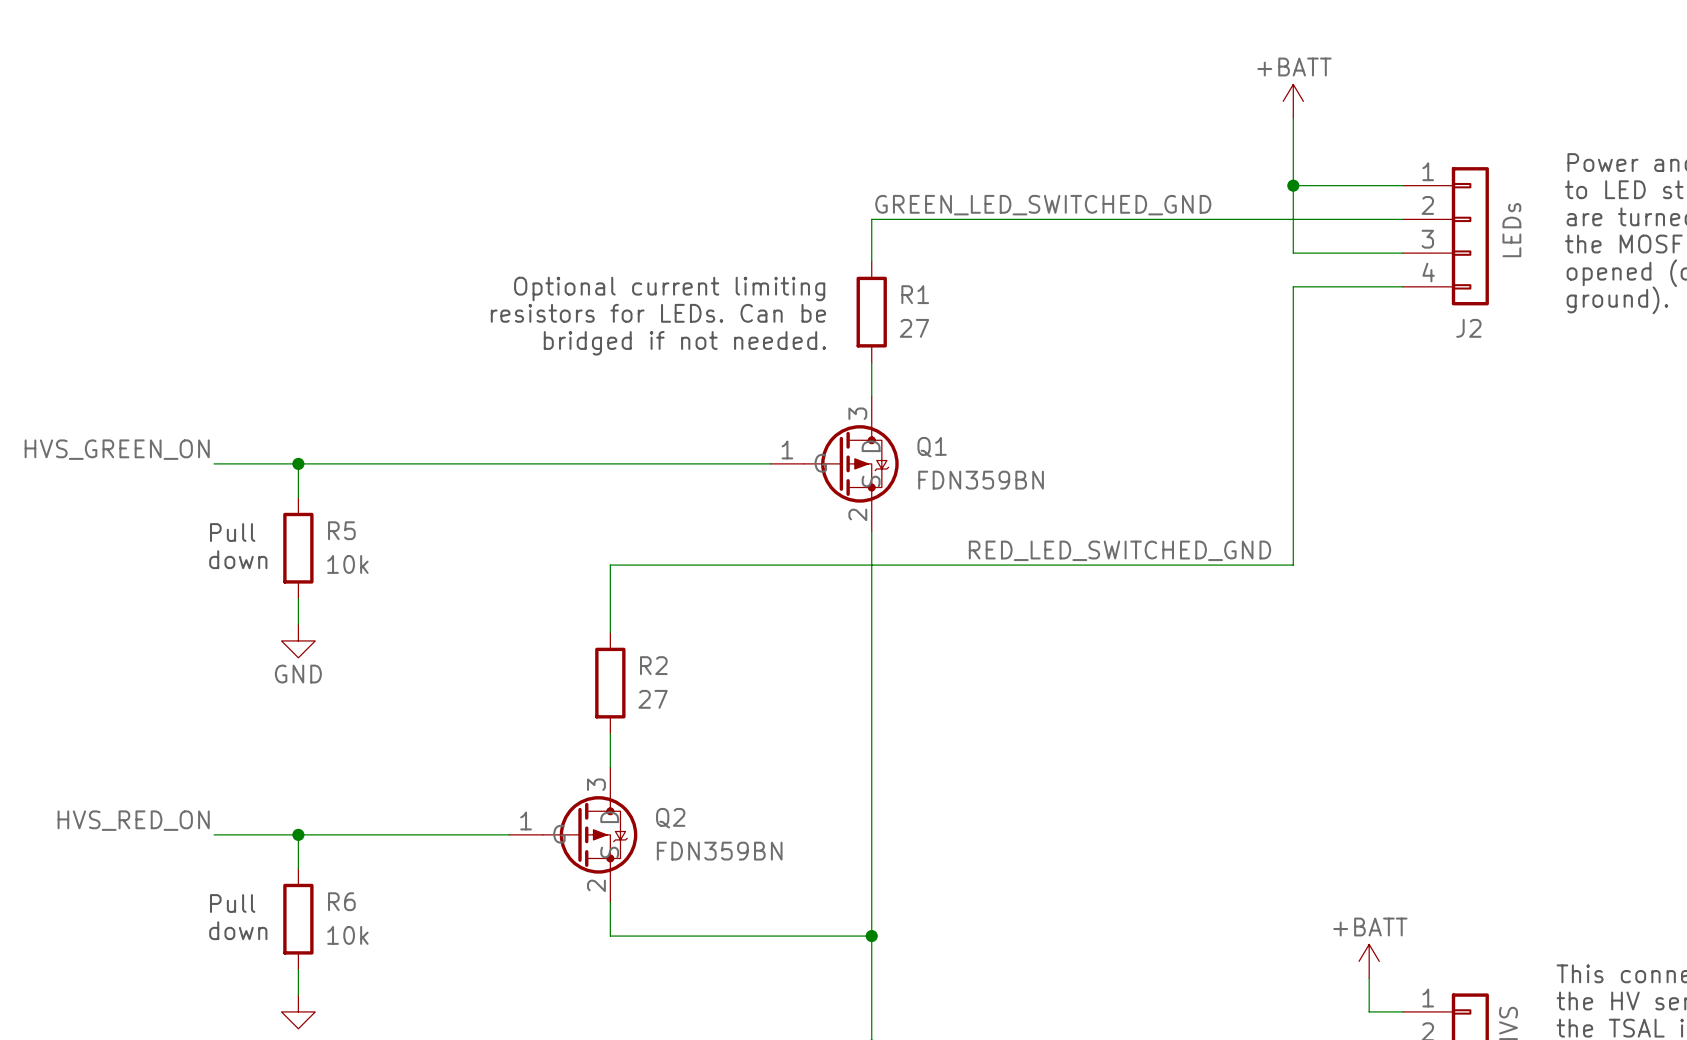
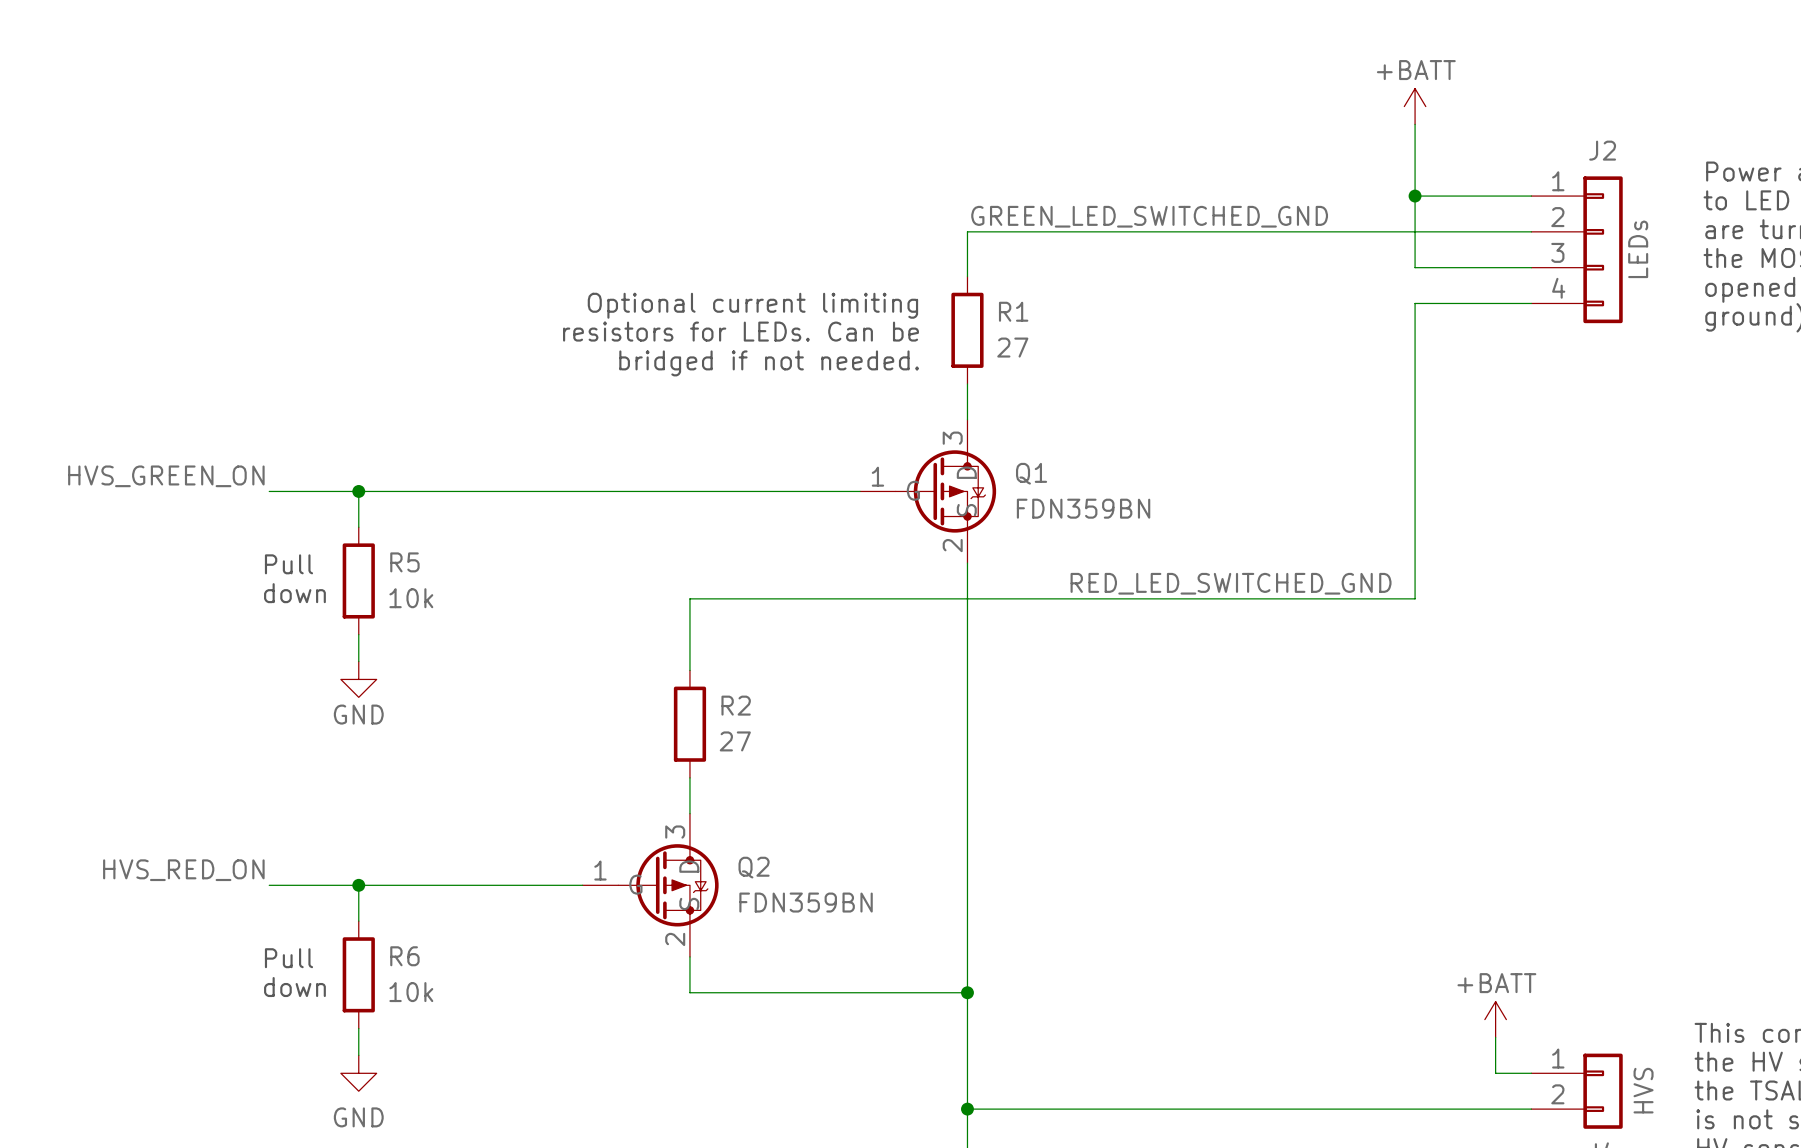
J2 value position: LEDs (1511, 230) -> LEDs (1638, 249)
J2 name position: J2 (1468, 328) -> J2 (1602, 150)

